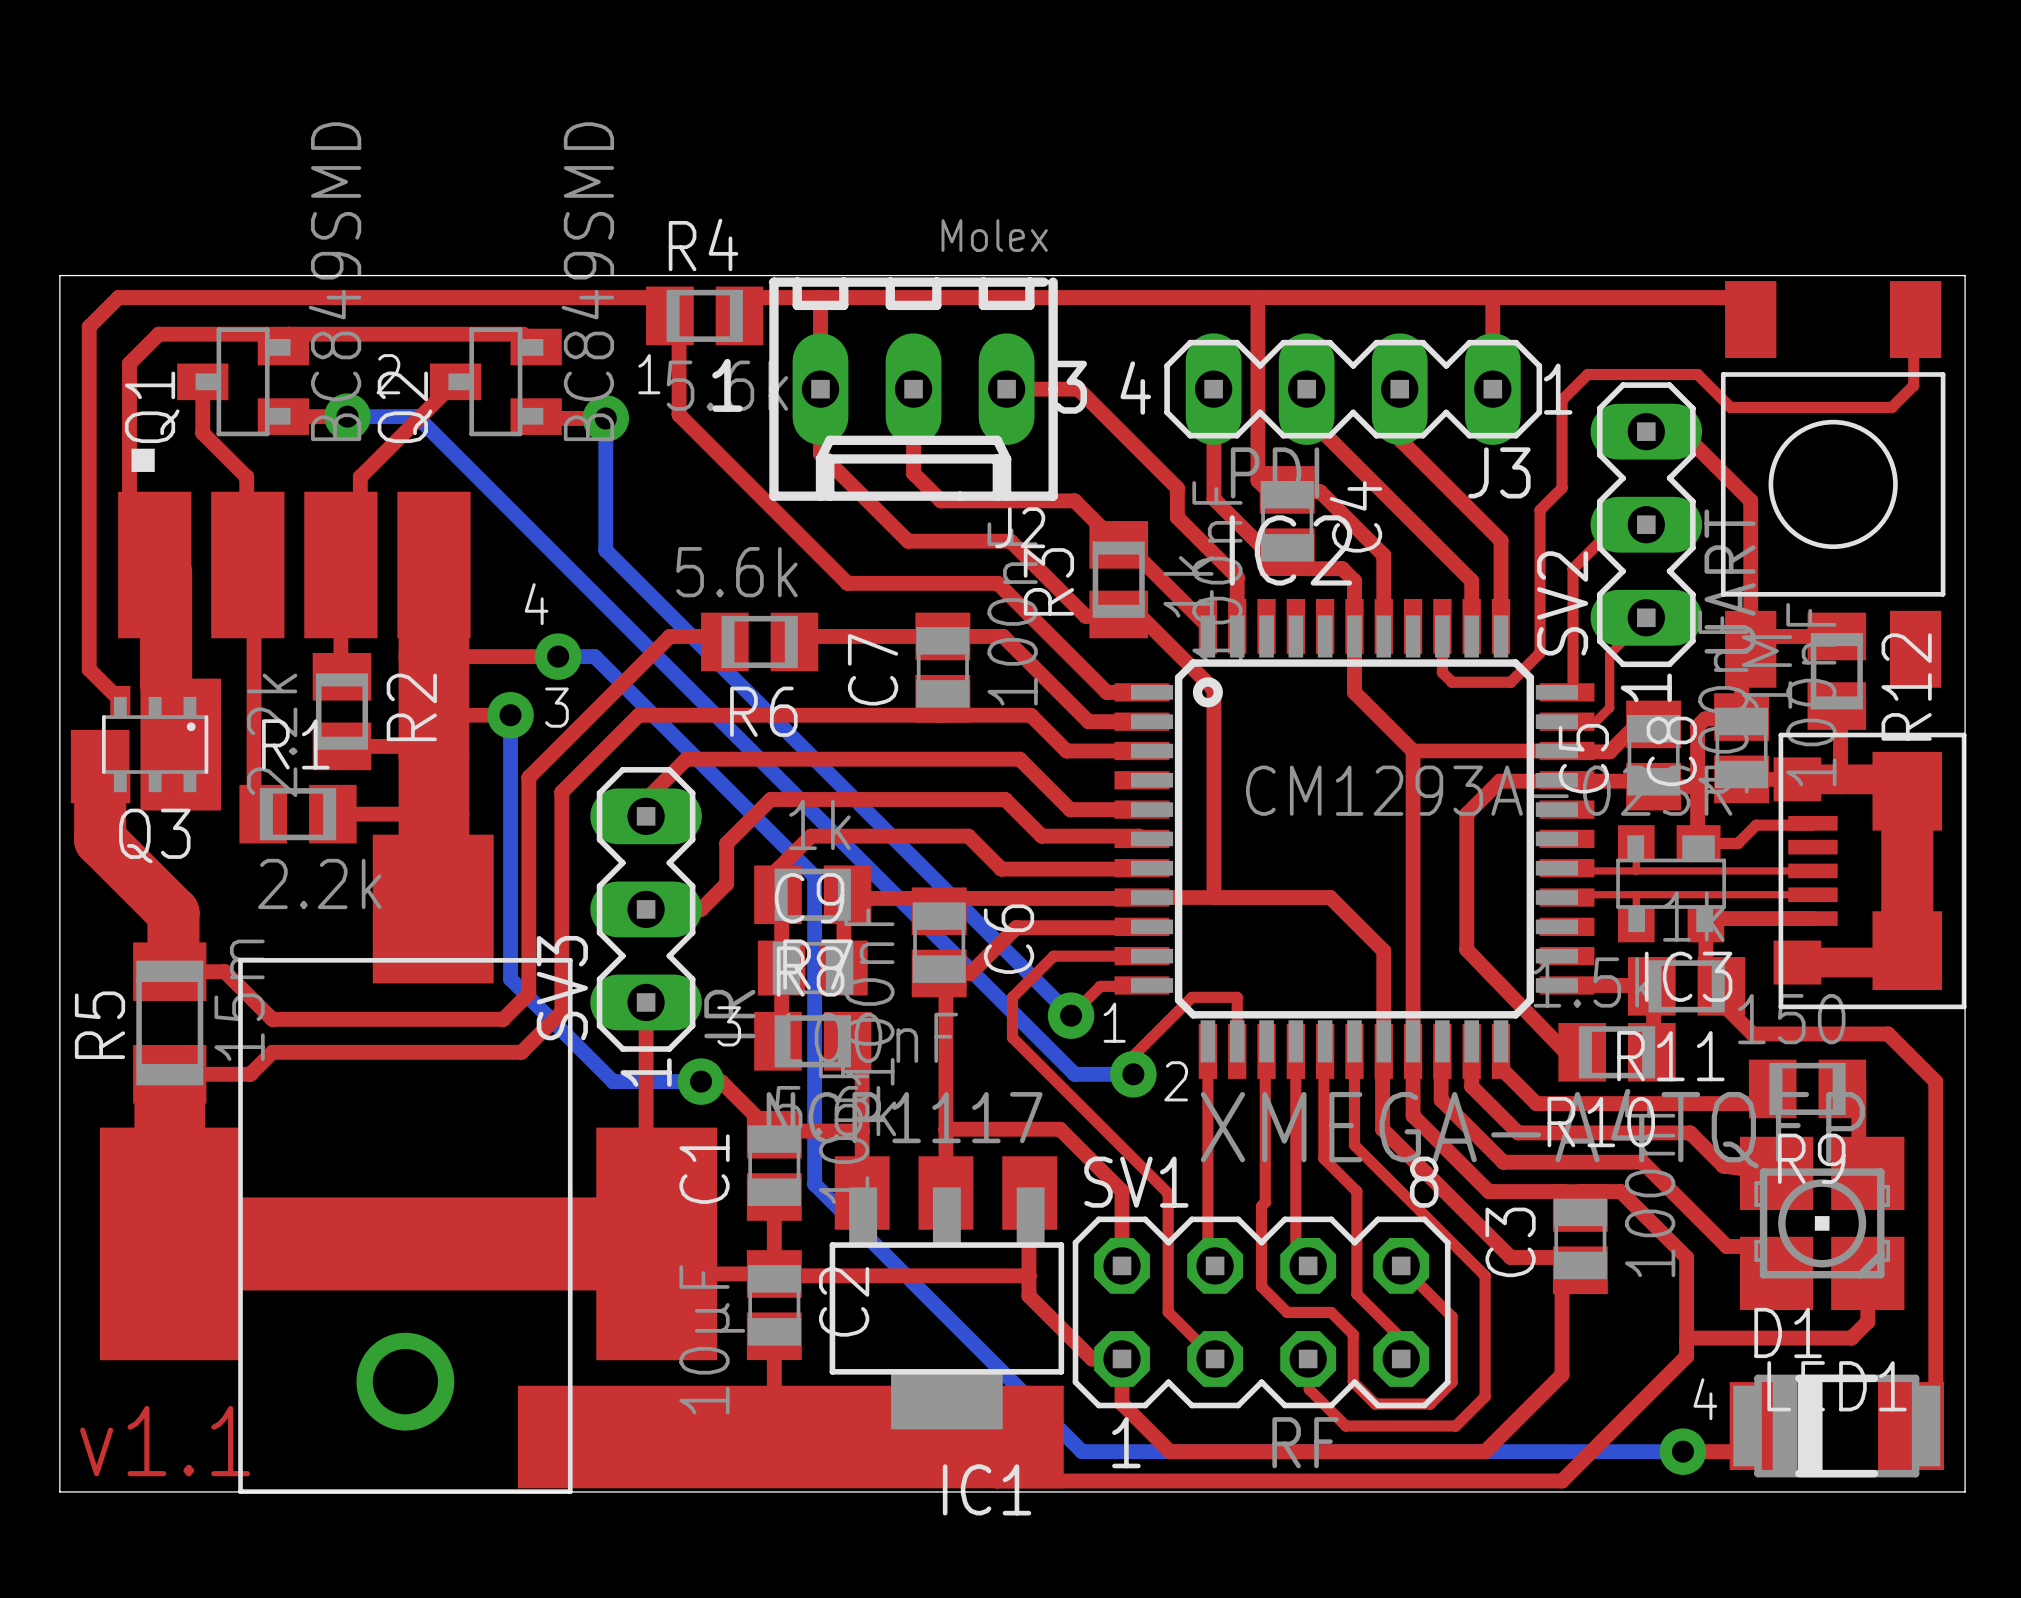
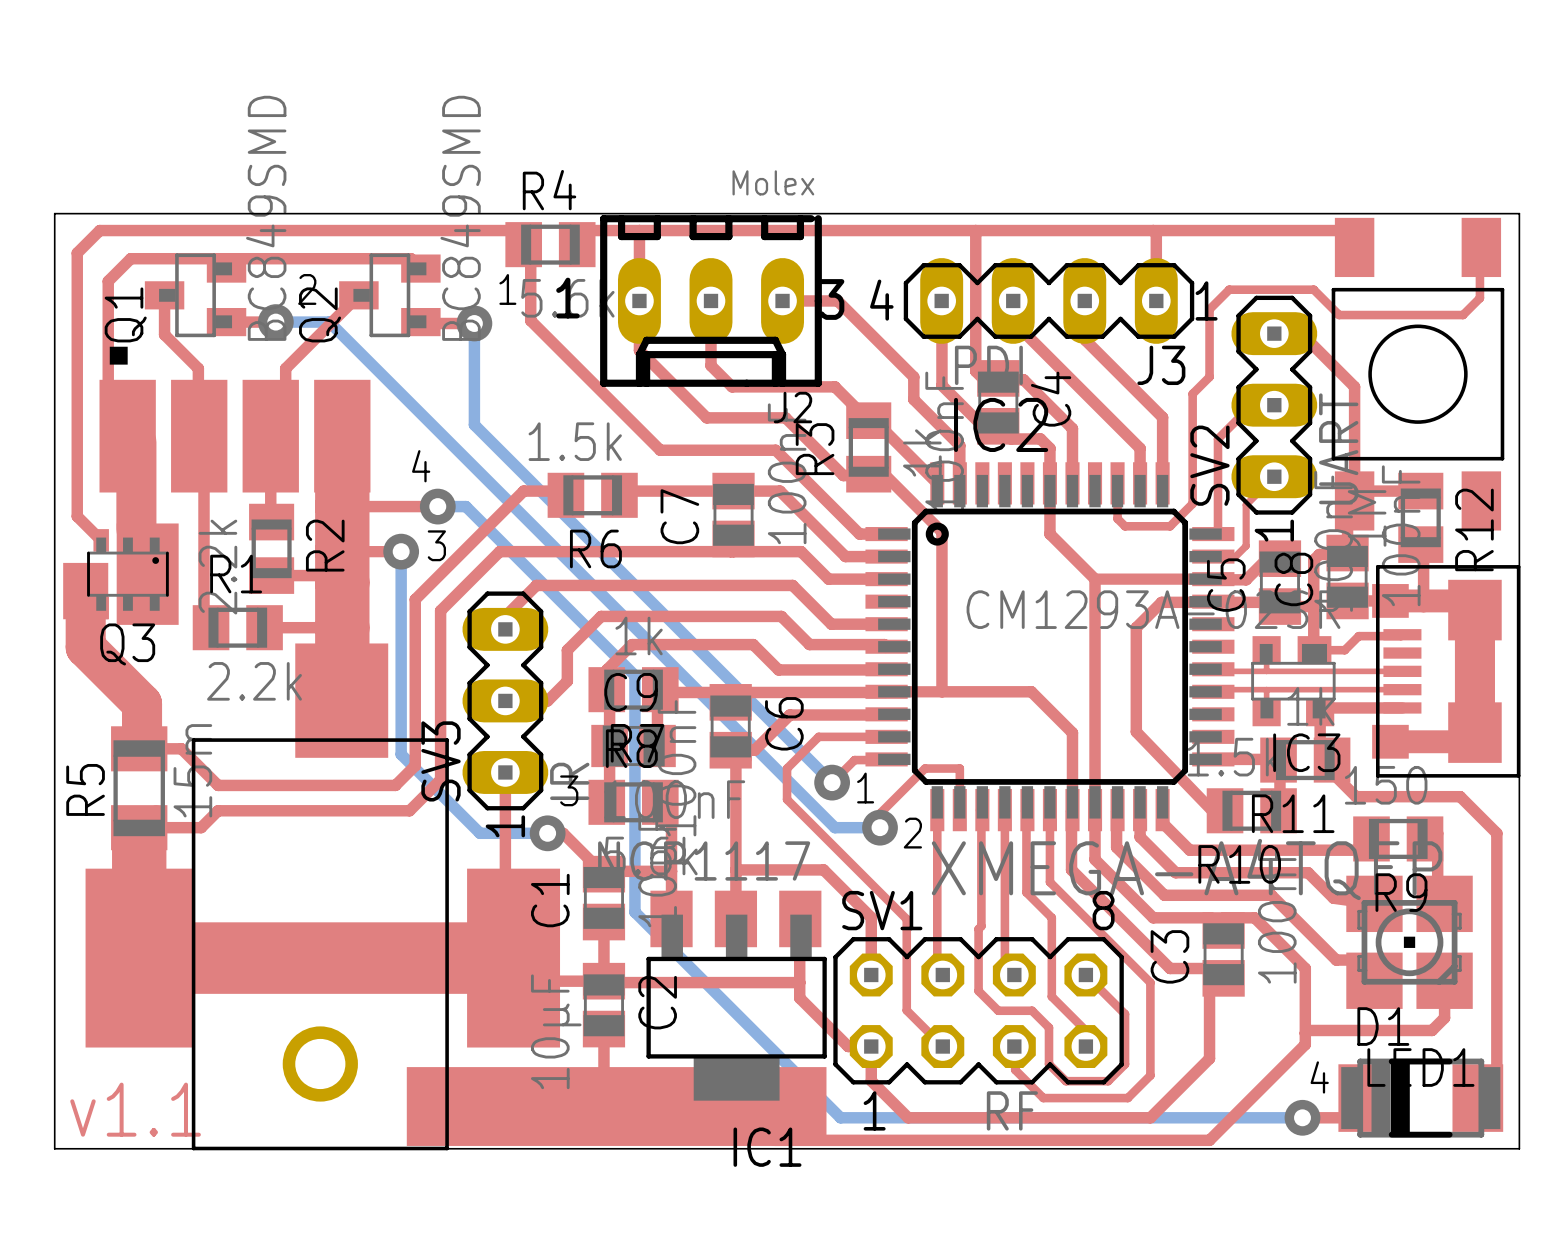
R6 value: 5.6k (736, 572) -> 1.5k (575, 441)

